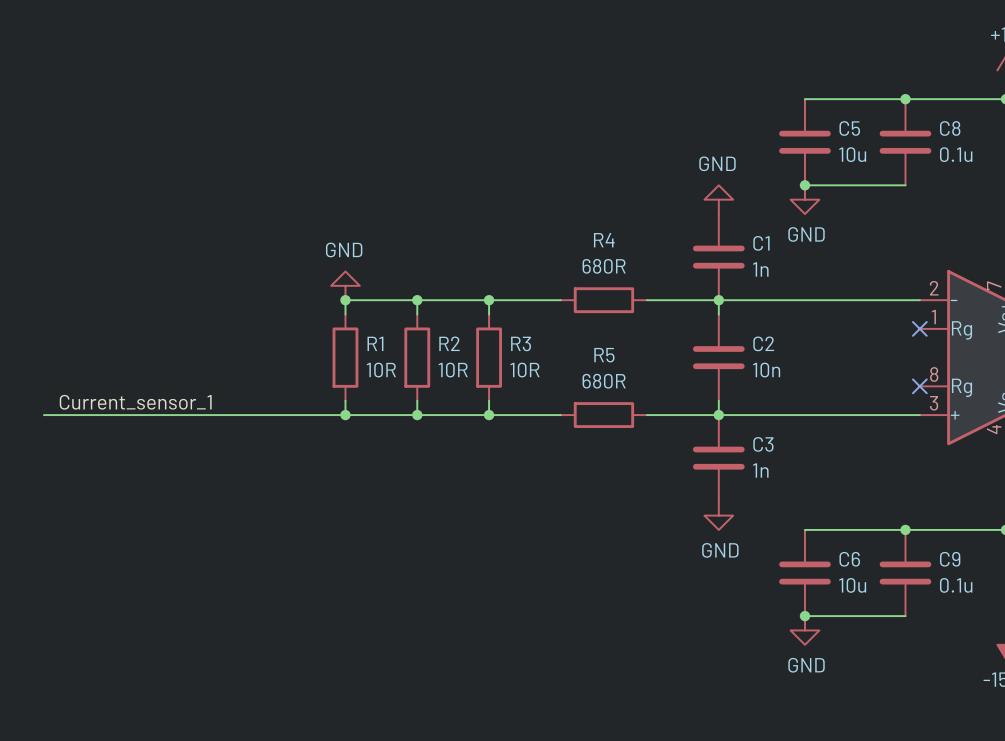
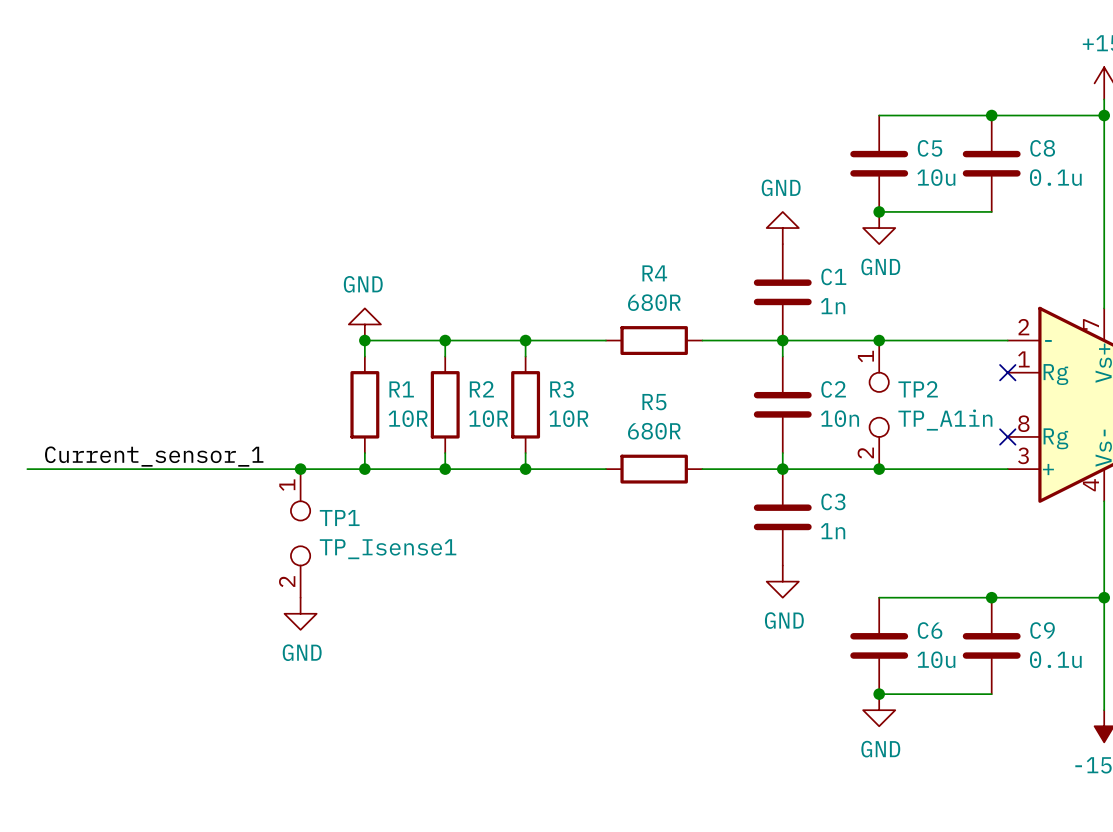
junction: none -> (879, 340)
TP2: none -> TP_A1in (879, 404)
junction: none -> (300, 469)
junction: none -> (879, 469)
TP1: none -> TP_Isense1 (300, 533)
power symbol: none -> GND (300, 613)

